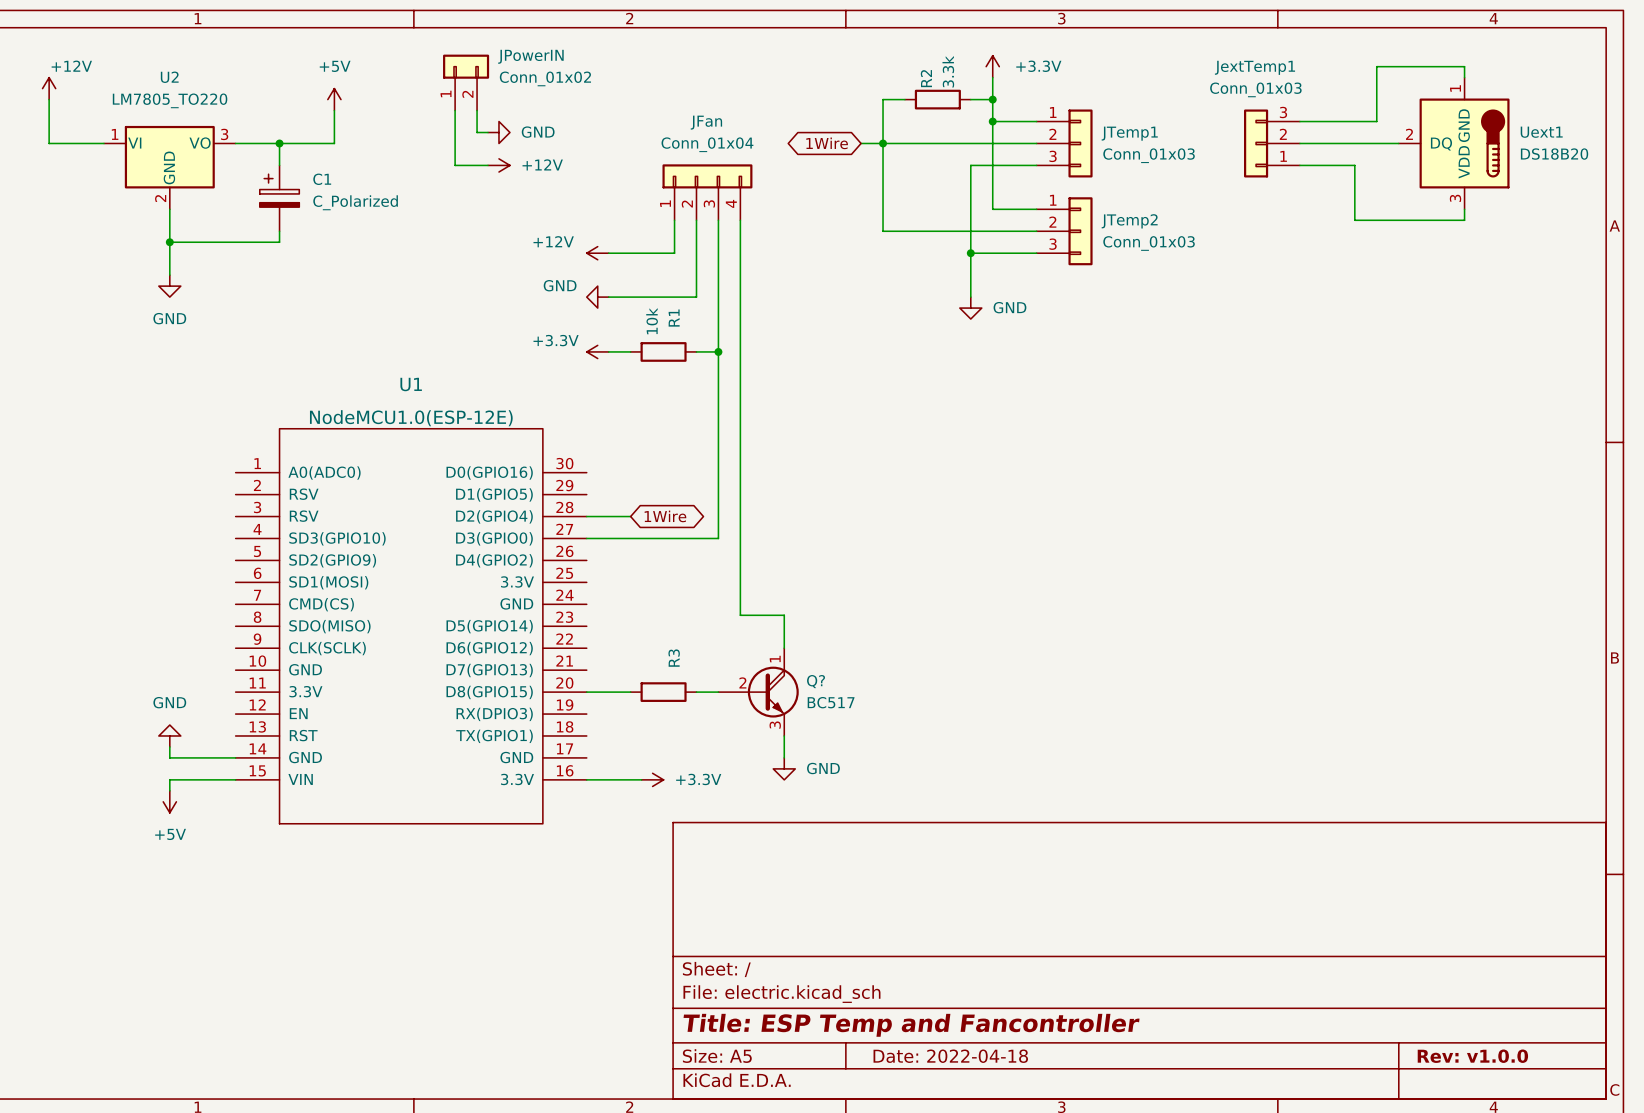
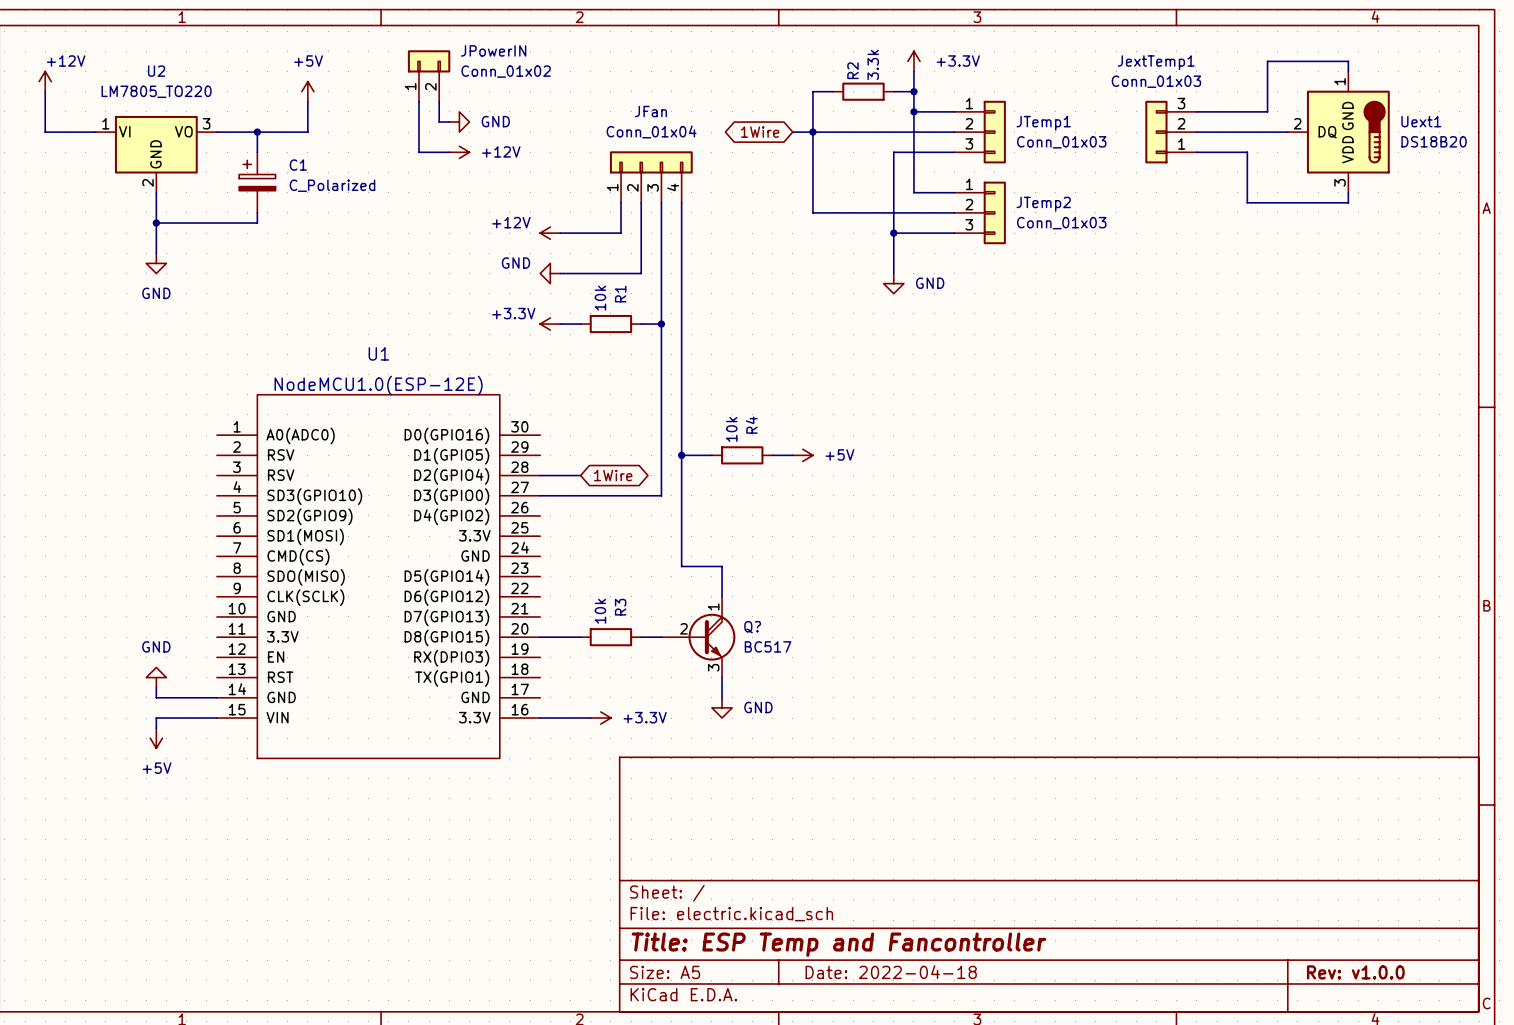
wire: none -> (681, 455) (711, 455)
junction: none -> (681, 455)
R4: none -> 10k (742, 455)
wire: none -> (772, 455) (792, 455)
power symbol: none -> +5V (802, 455)
R3 value: none -> 10k (600, 611)

